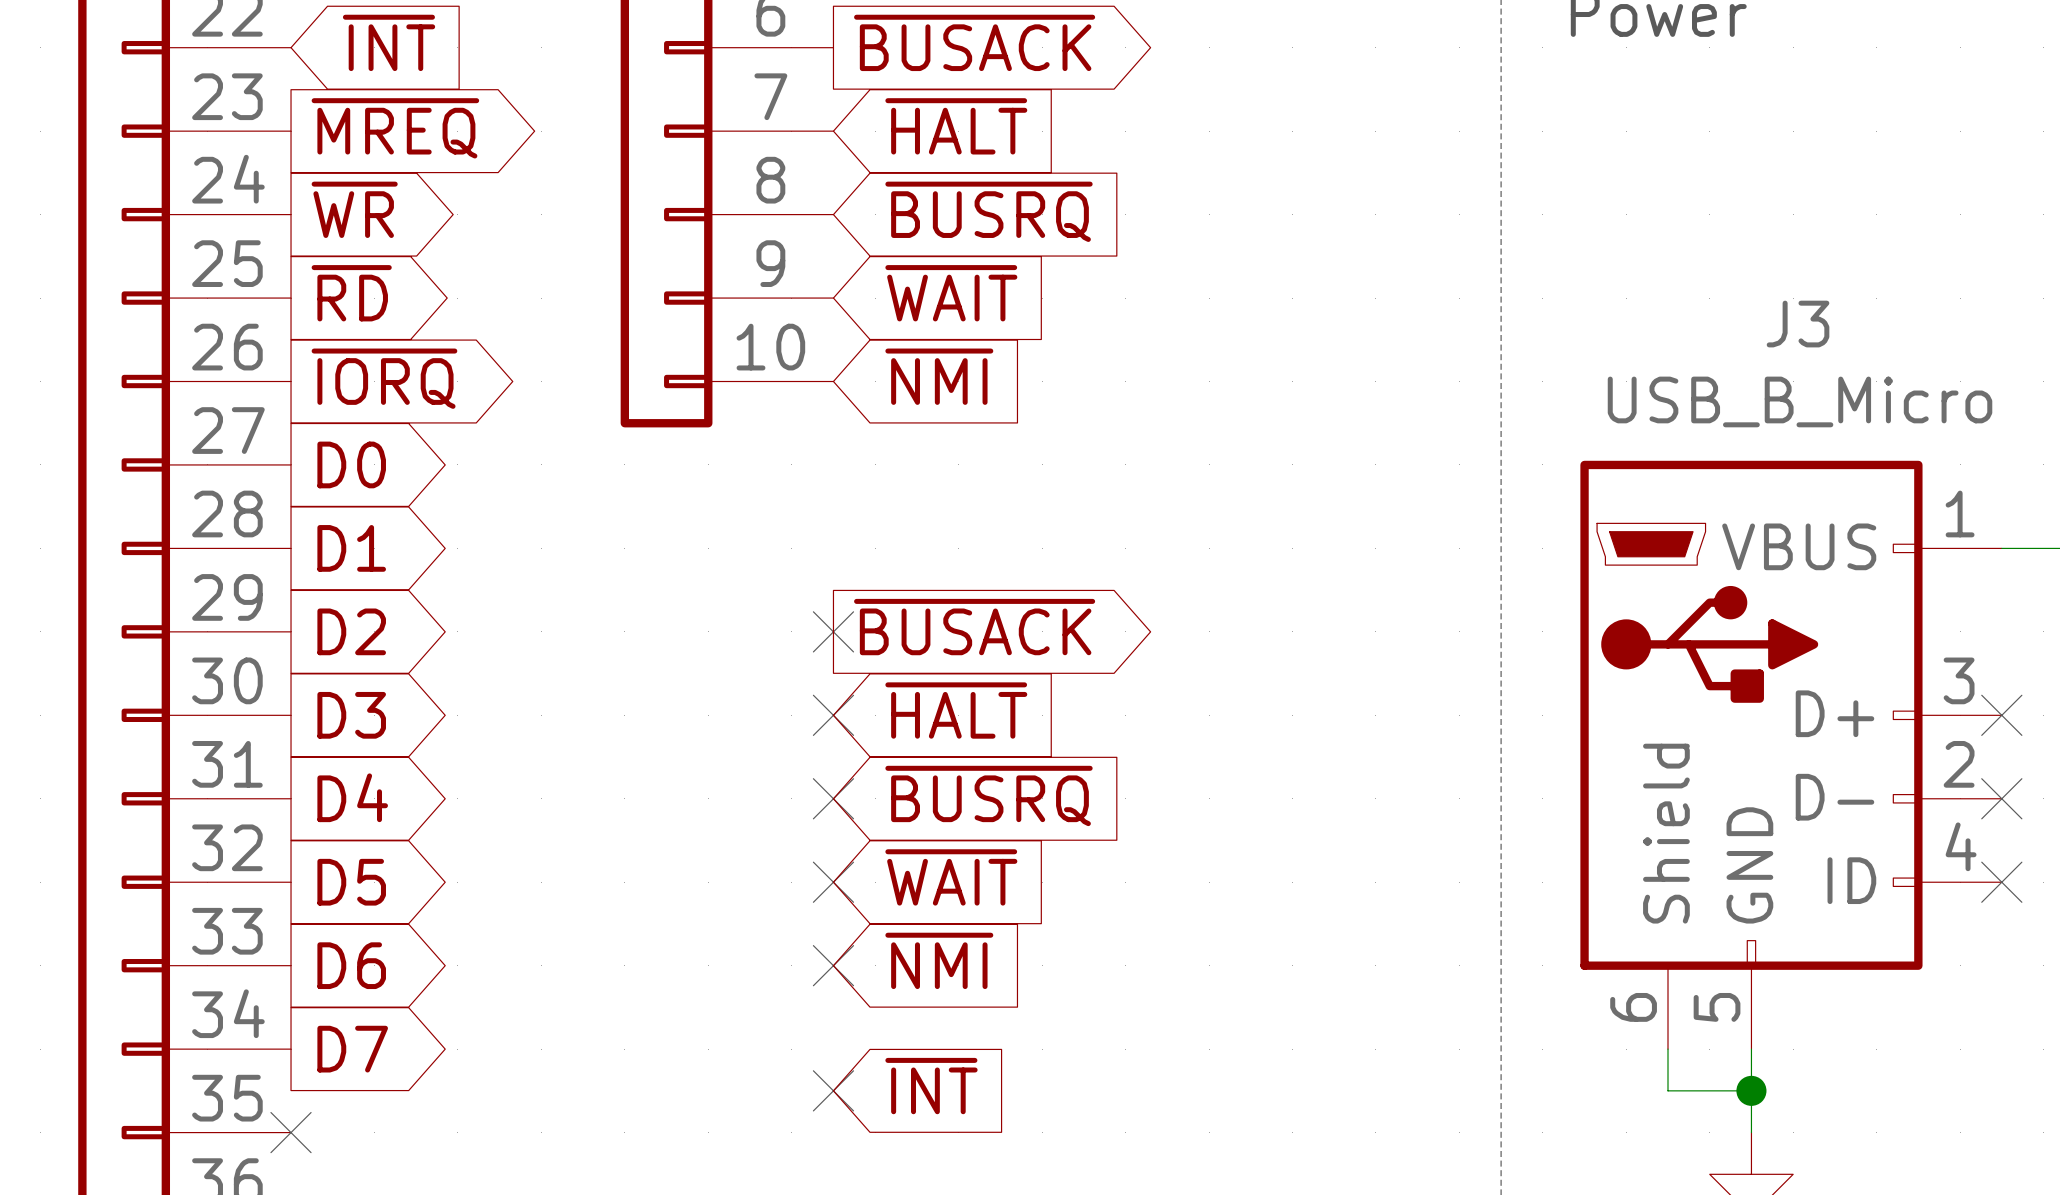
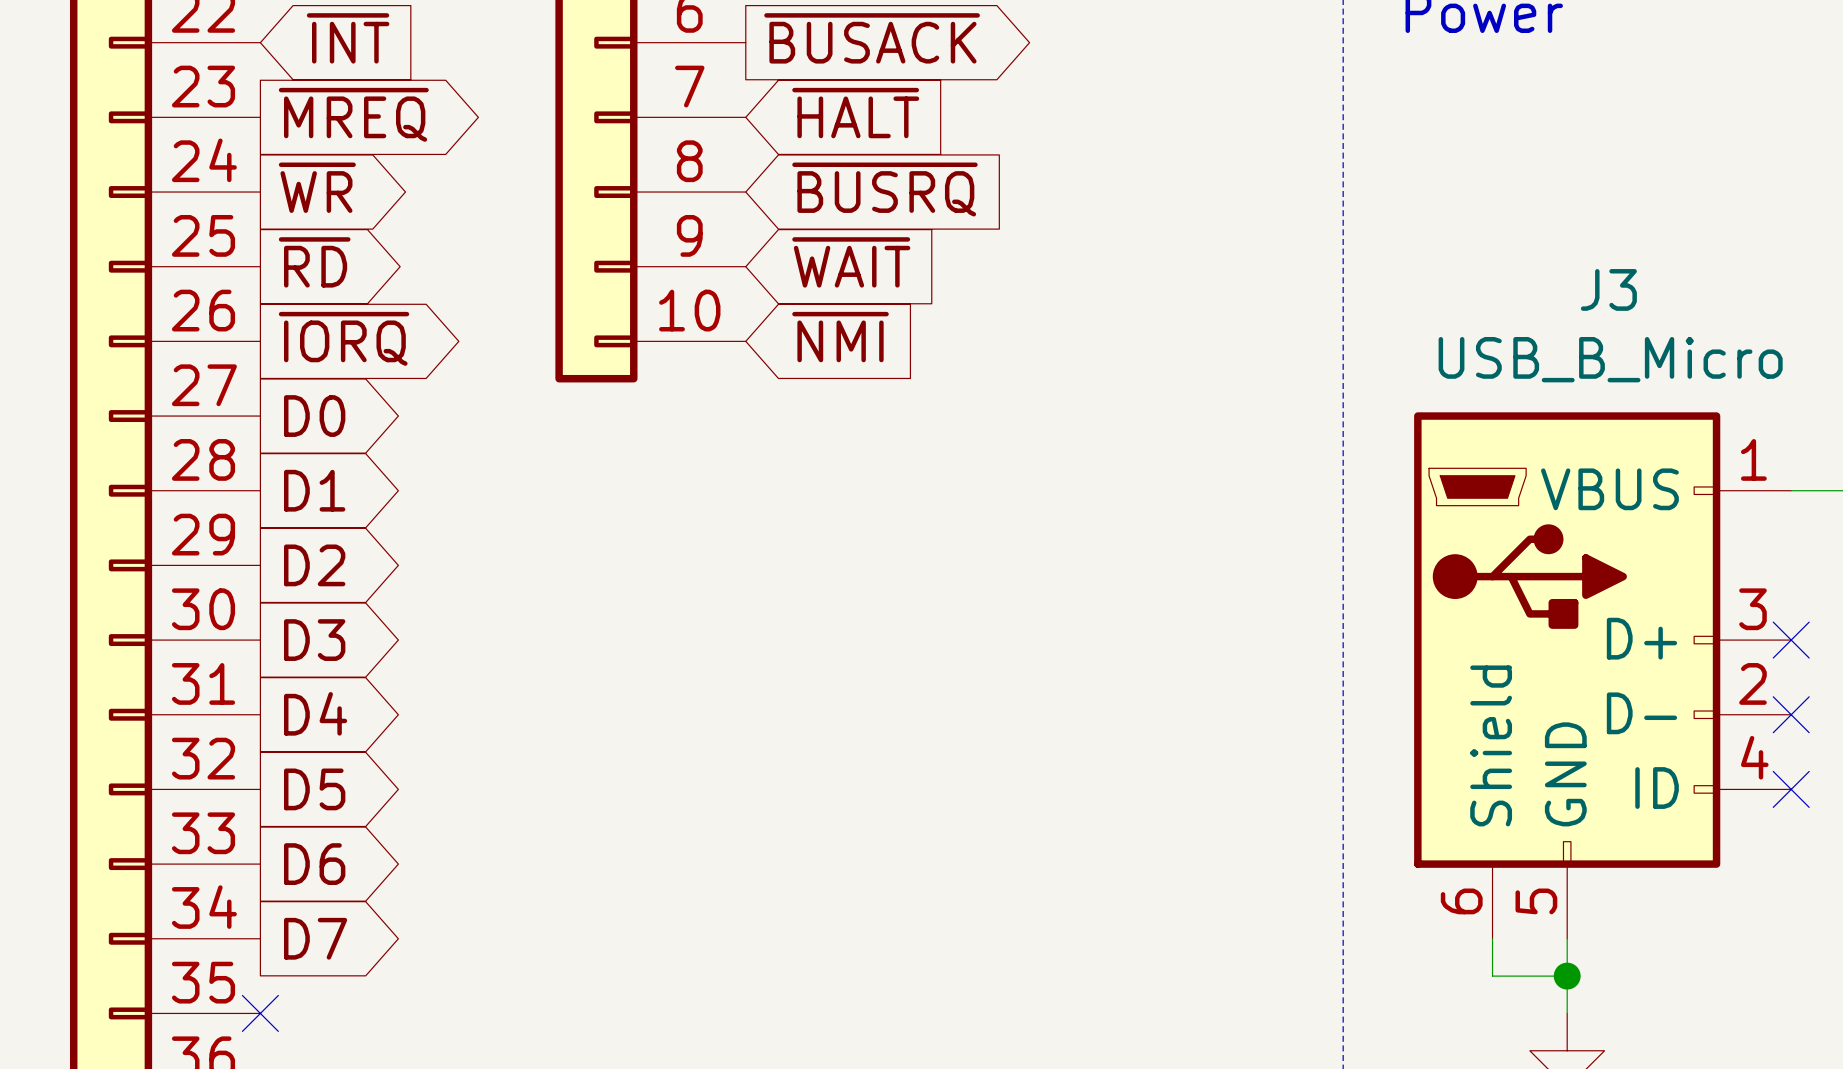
global label: ~{BUSACK} (974, 627) -> none
no-connect mark: (833, 631) -> none
global label: ~{HALT} (956, 710) -> none
no-connect mark: (833, 715) -> none
global label: ~{BUSRQ} (989, 795) -> none
no-connect mark: (833, 798) -> none
global label: ~{WAIT} (951, 877) -> none
no-connect mark: (833, 882) -> none
global label: ~{NMI} (939, 960) -> none
no-connect mark: (833, 965) -> none
global label: ~{INT} (931, 1086) -> none
no-connect mark: (833, 1090) -> none

